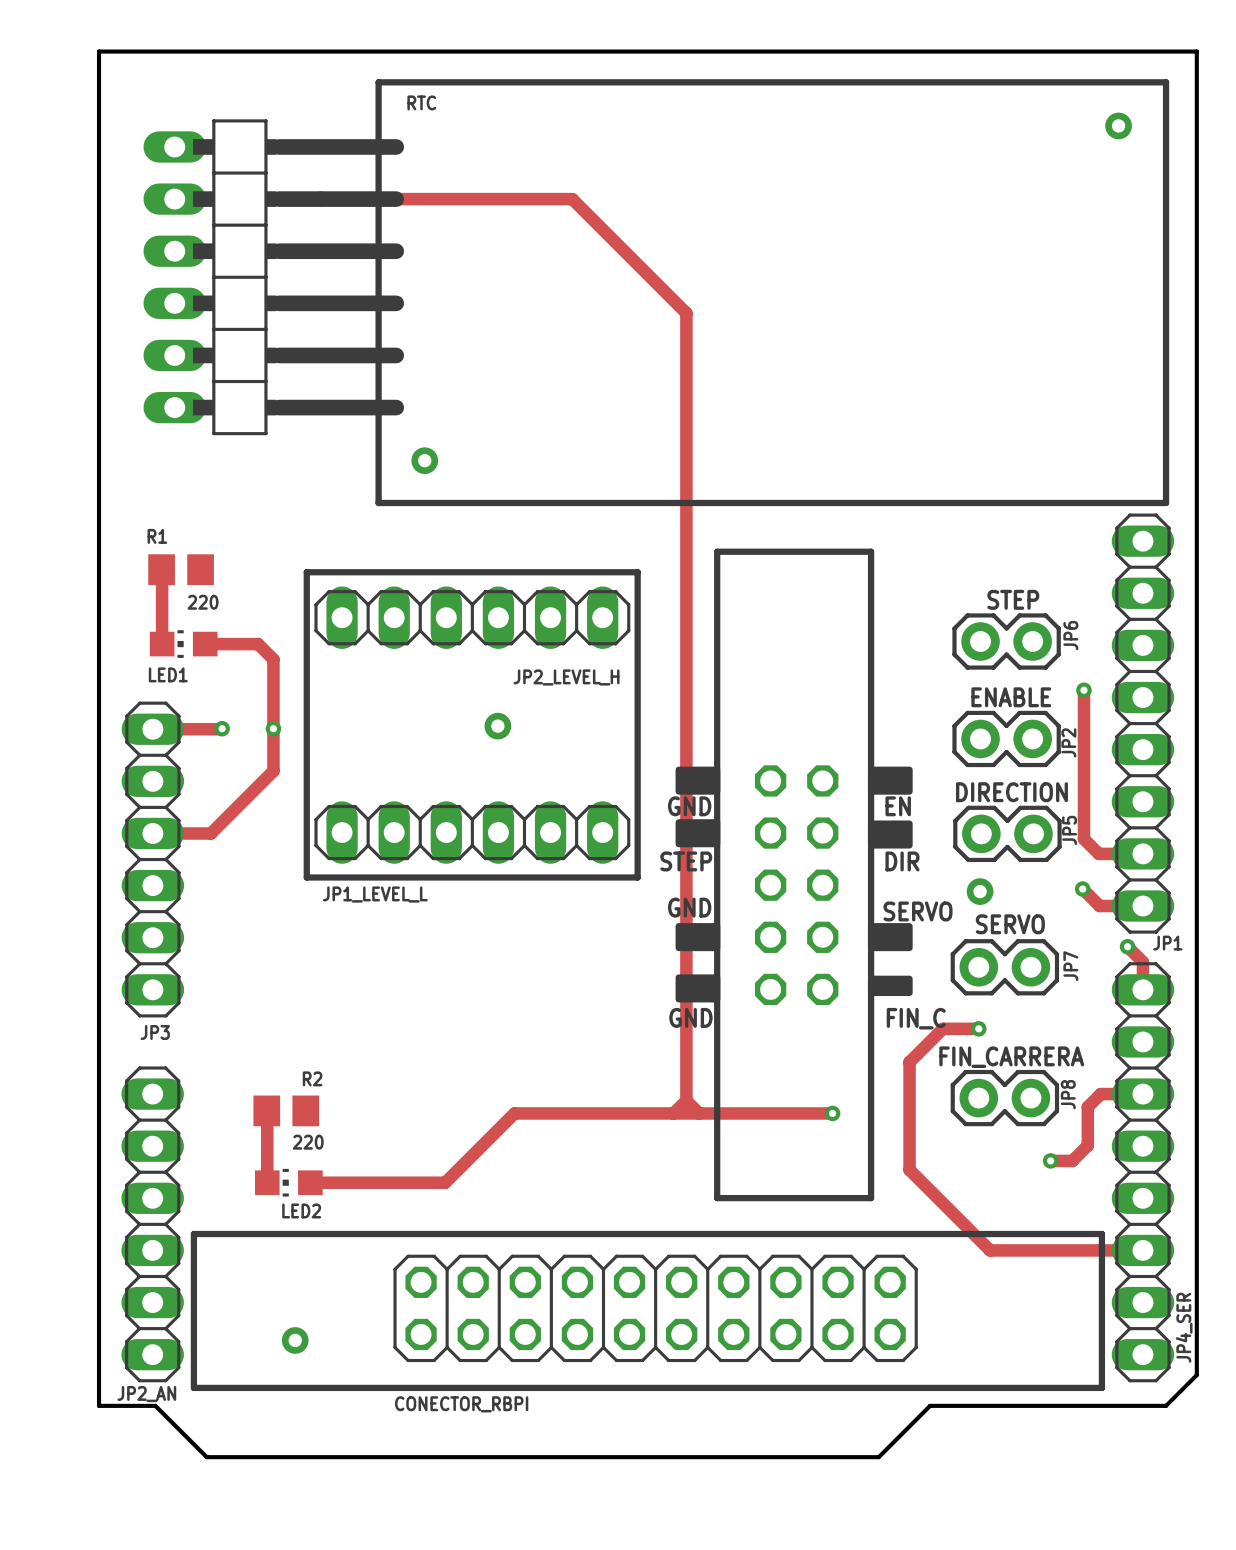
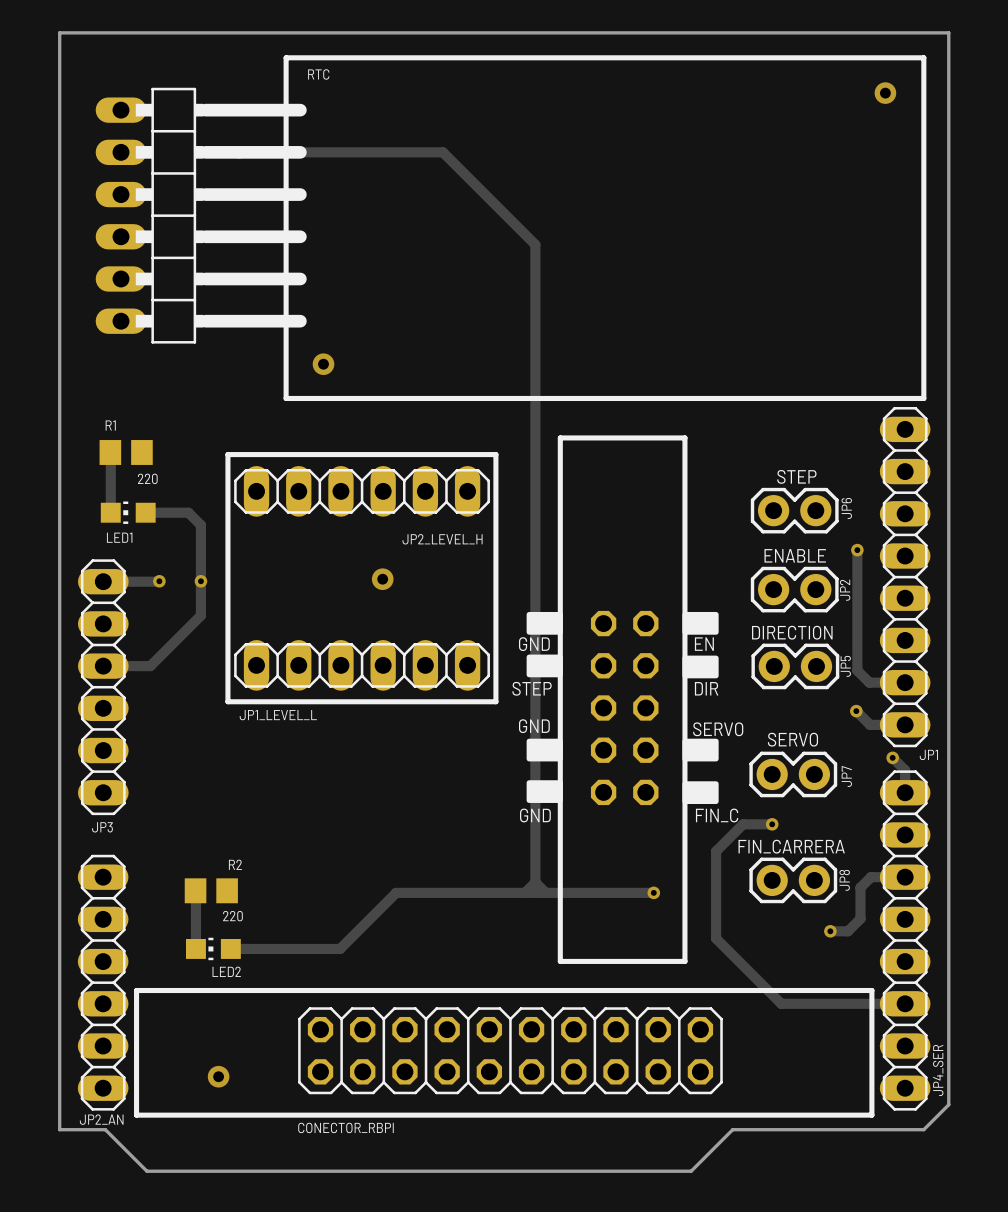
via: (980, 891) -> none
drawing shape: [867, 975, 913, 997] -> [682, 781, 719, 805]

